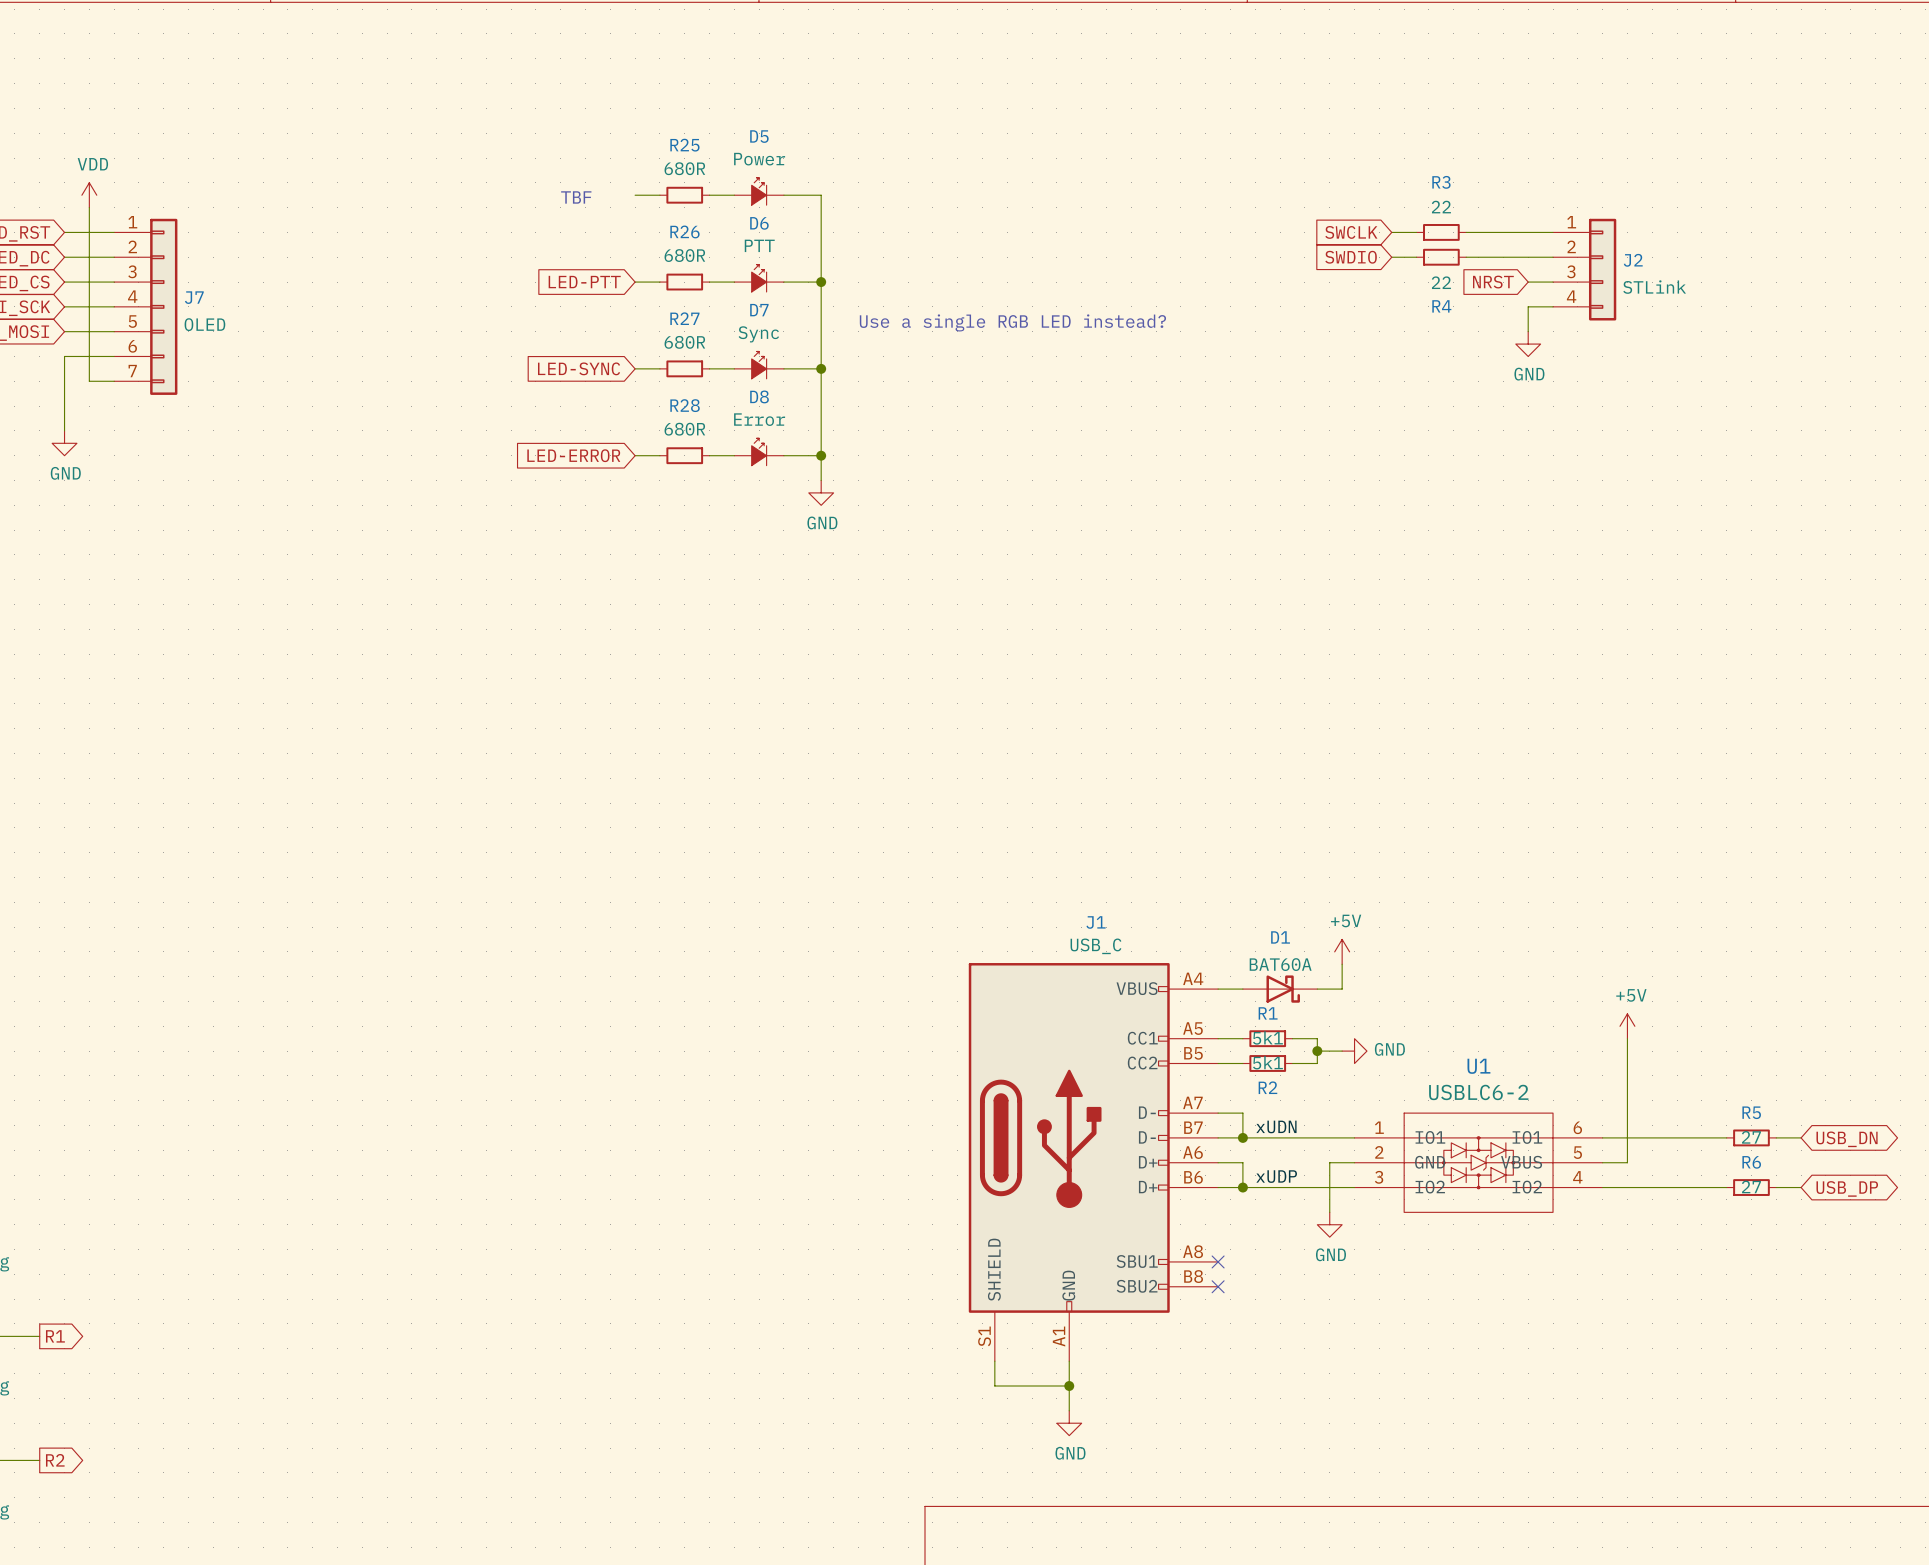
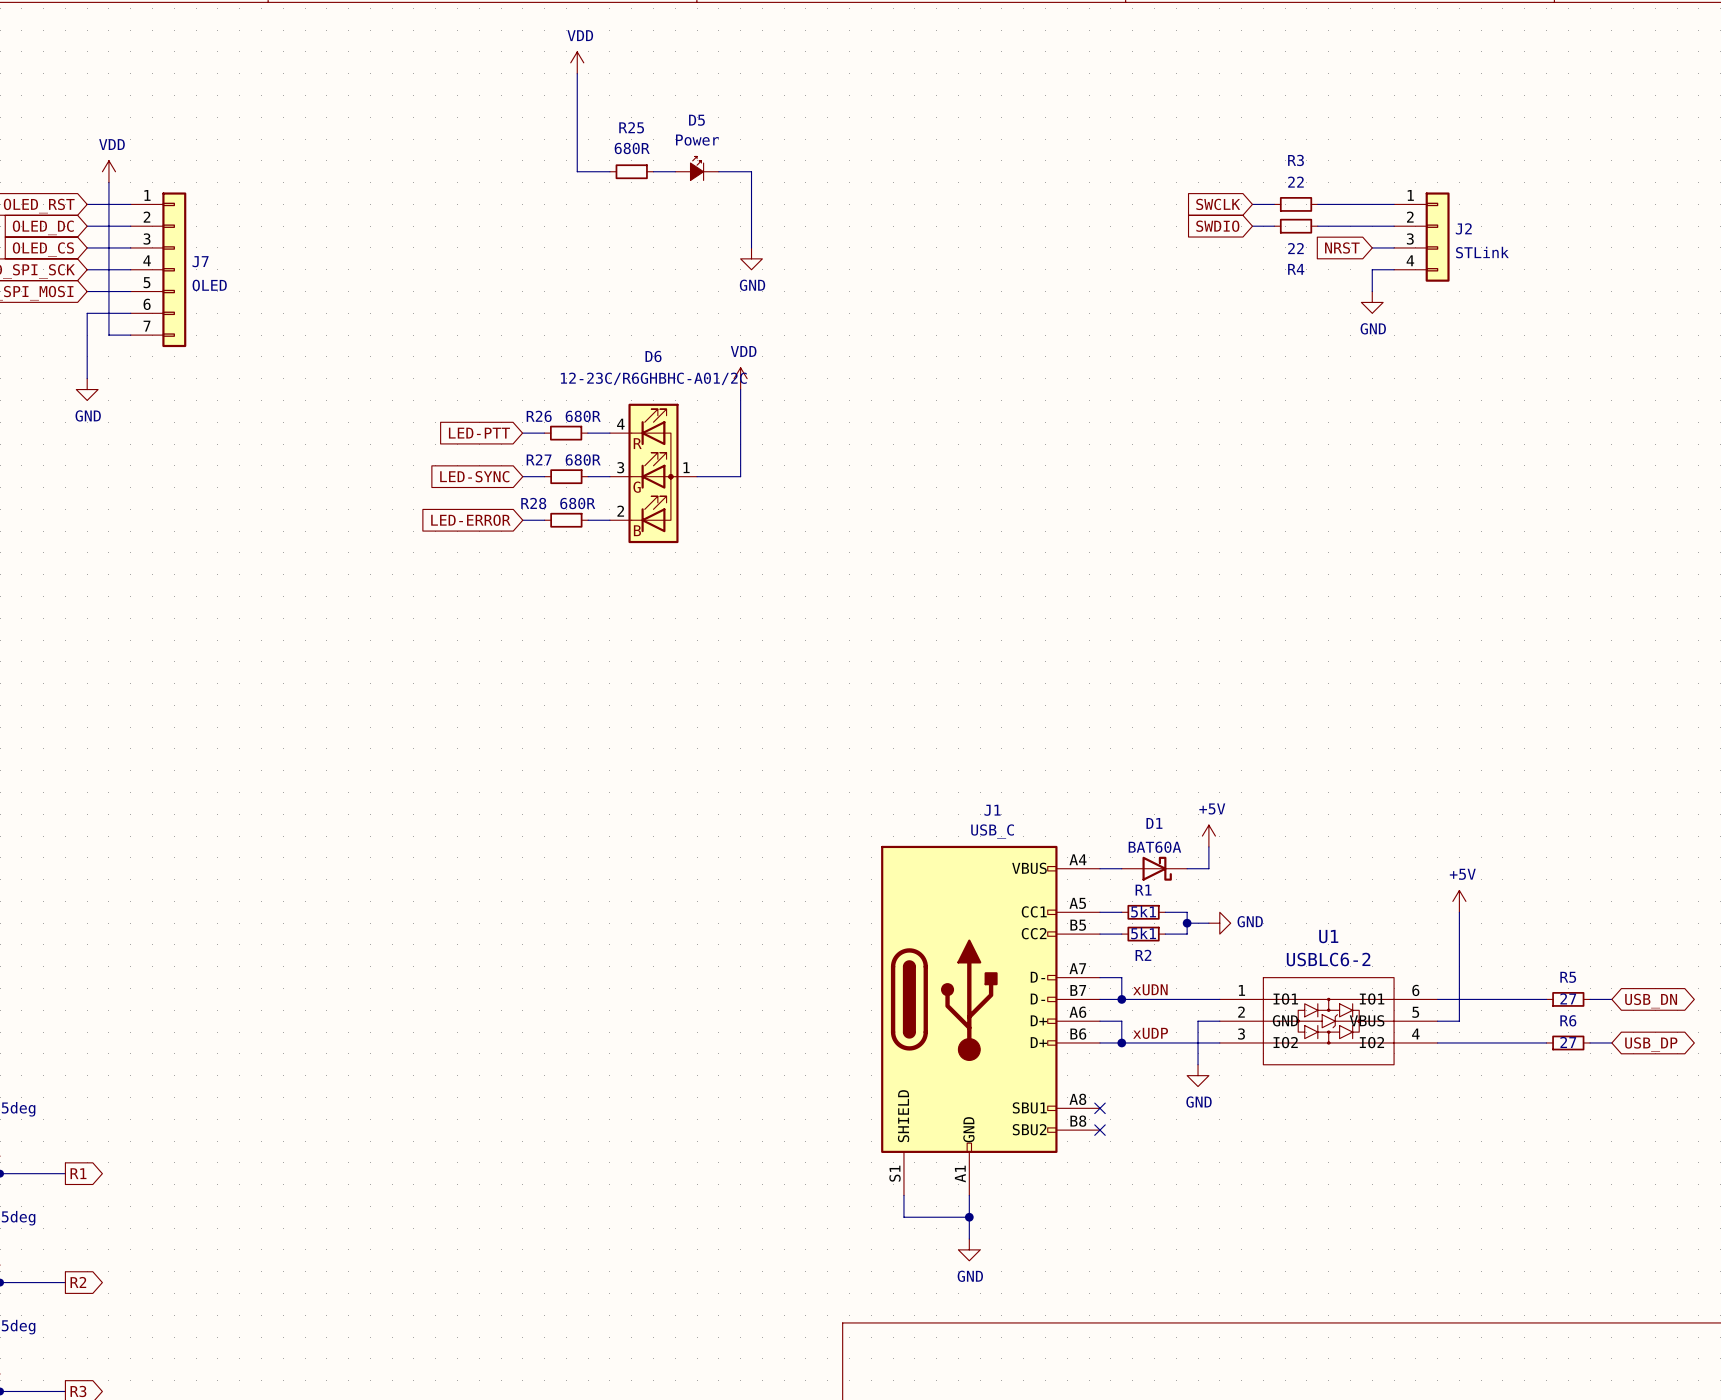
power symbol: none -> VDD (577, 62)
wire: none -> (577, 73) (577, 171) (588, 171)
text: TBF (576, 197) -> none
D6 name position: D6 (759, 223) -> D6 (653, 356)
R26 name position: R26 (684, 231) -> R26 (539, 416)
D6 value: PTT (759, 245) -> 12-23C/R6GHBHC-A01/2C (653, 378)
R26 value position: 680R (684, 255) -> 680R (583, 416)
D6 symbol: [734, 264, 784, 292] -> [609, 403, 698, 544]
global label position: LED-PTT (584, 282) -> LED-PTT (479, 433)
wire: (635, 282) (659, 282) -> (522, 433) (544, 433)
R26 position: (684, 282) -> (566, 433)
wire: (709, 282) (734, 282) -> none
wire: (783, 282) (821, 282) (821, 480) -> none
junction: (821, 282) -> none
R27 name position: R27 (684, 318) -> R27 (539, 459)
text: Use a single RGB LED instead? (1012, 322) -> none
R27 value position: 680R (684, 342) -> 680R (583, 459)
D7: Sync (759, 365) -> none
global label position: LED-SYNC (579, 368) -> LED-SYNC (474, 476)
wire: (635, 368) (659, 368) -> (522, 520) (544, 520)
R27 position: (684, 368) -> (566, 476)
wire: (709, 368) (734, 368) -> (588, 520) (609, 520)
wire: (783, 368) (821, 368) -> none
junction: (821, 368) -> none
R28 name position: R28 (685, 405) -> R28 (533, 503)
R28 value position: 680R (684, 429) -> 680R (577, 503)
power symbol: none -> VDD (740, 378)
wire: none -> (740, 389) (740, 476) (697, 476)
D8: Error (759, 451) -> none
global label position: LED-ERROR (573, 455) -> LED-ERROR (470, 520)
wire: (635, 455) (659, 455) -> (522, 476) (544, 476)
R28 position: (684, 455) -> (566, 520)
wire: (709, 455) (734, 455) -> (588, 476) (609, 476)
wire: (783, 455) (821, 455) -> none
junction: (821, 455) -> none
wire: none -> (587, 433) (609, 433)
power symbol position: GND (821, 492) -> GND (751, 258)

